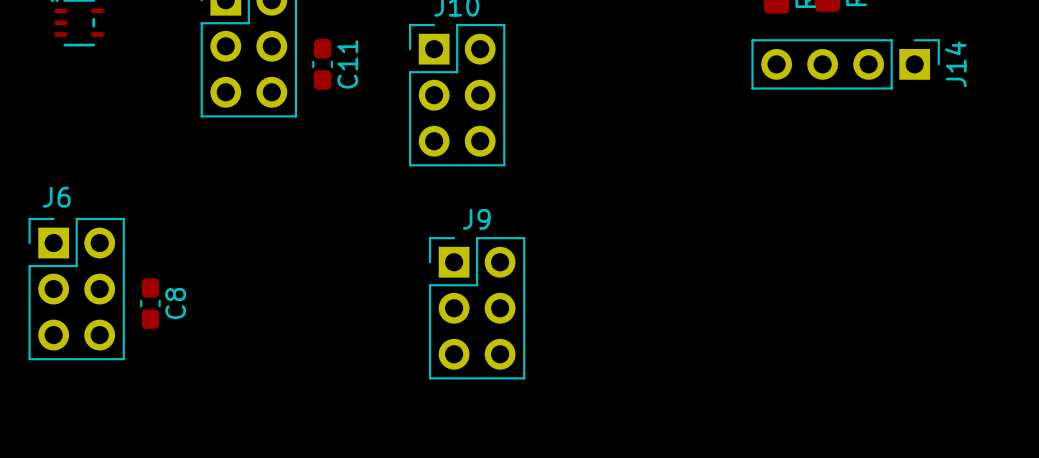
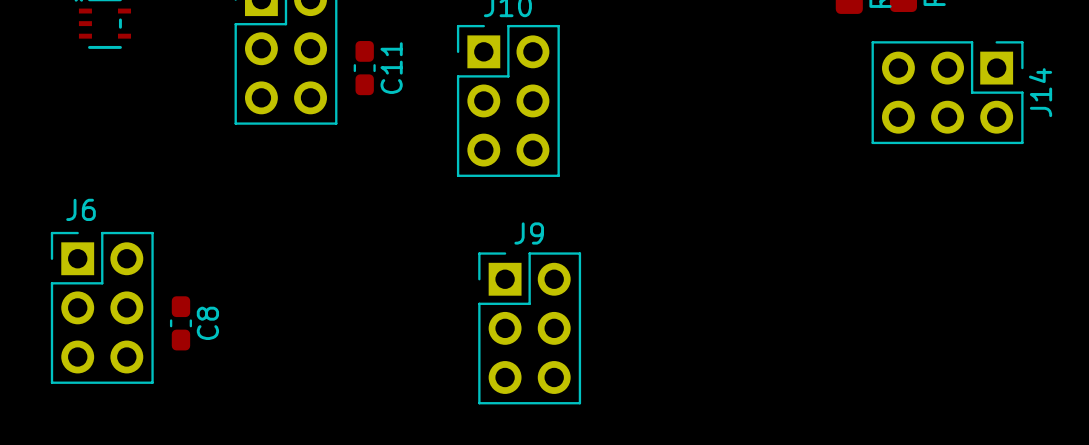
J14 footprint: [751, 39, 940, 90] -> [871, 41, 1024, 145]

